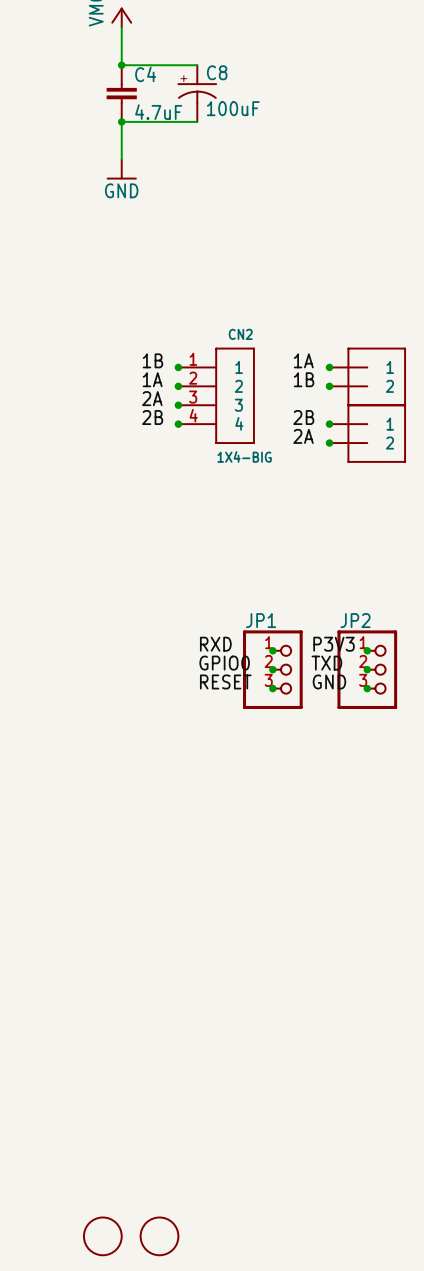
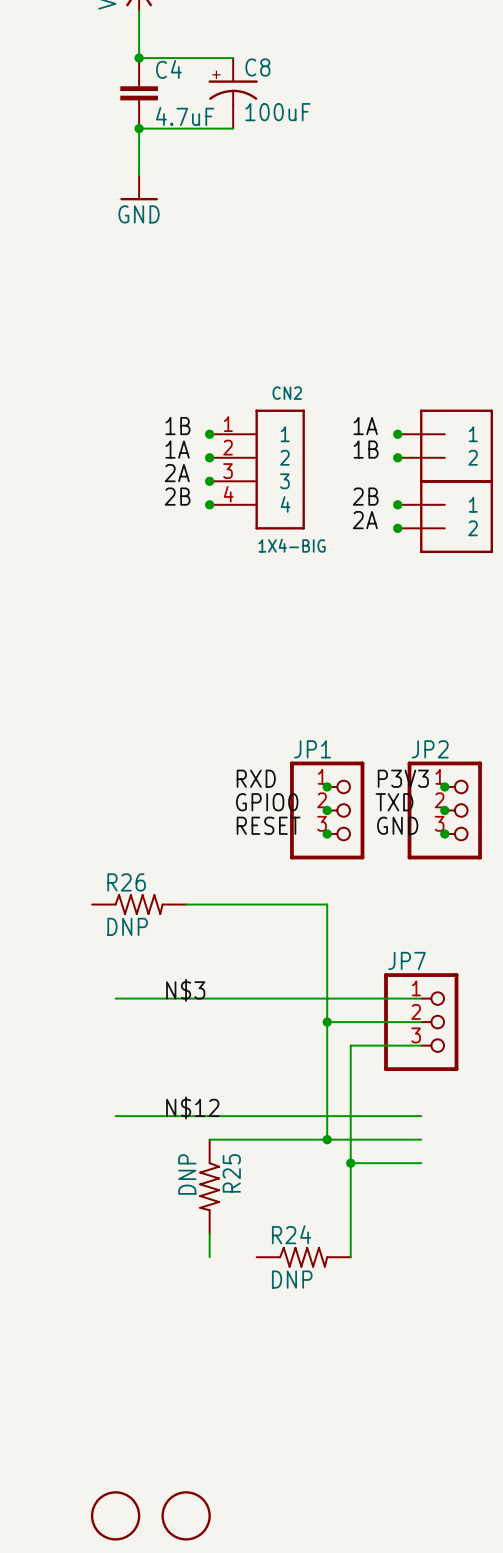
R26: none -> DNP (139, 904)
wire: none -> (186, 904) (327, 904) (327, 1139)
label: none -> N$3 (185, 990)
wire: none -> (115, 998) (421, 998)
wire: none -> (327, 1022) (421, 1022)
junction: none -> (327, 1022)
JP7: none -> (421, 1022)
wire: none -> (421, 1045) (350, 1045) (350, 1257)
label: none -> N$12 (192, 1107)
wire: none -> (115, 1116) (421, 1116)
wire: none -> (209, 1139) (421, 1139)
junction: none -> (327, 1139)
wire: none -> (350, 1163) (421, 1163)
junction: none -> (350, 1163)
R25: none -> DNP (209, 1186)
wire: none -> (209, 1233) (209, 1257)
R24: none -> DNP (303, 1257)

